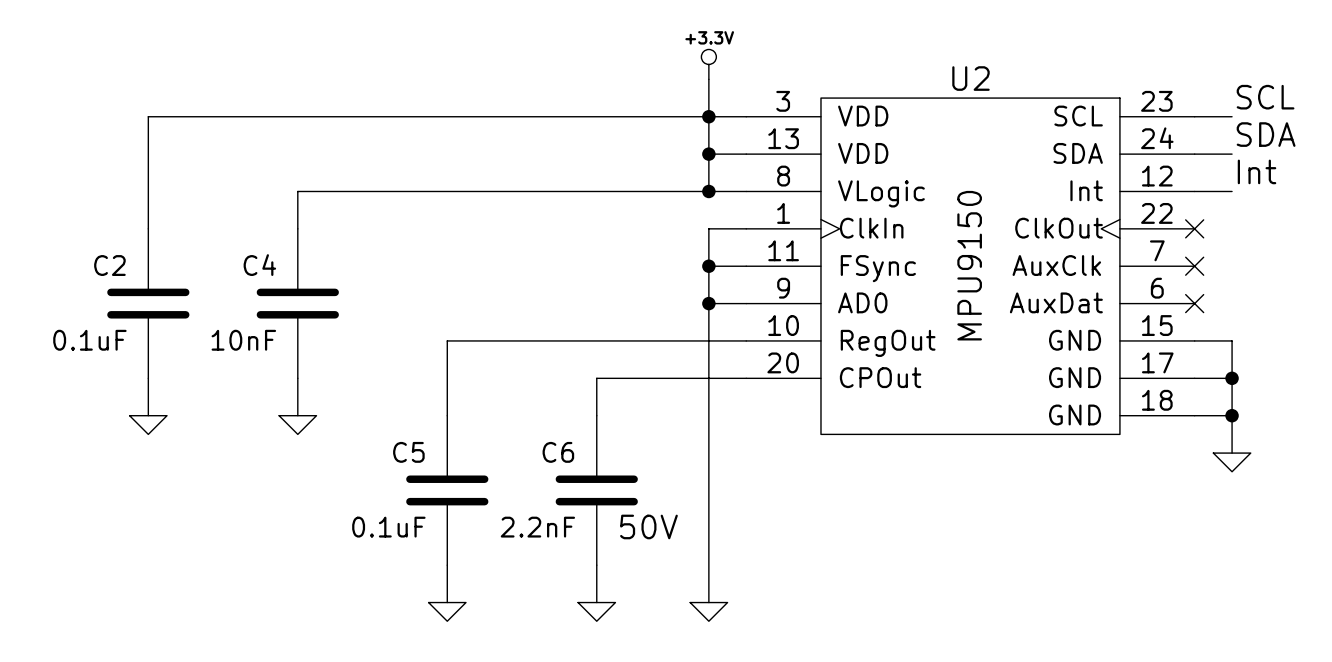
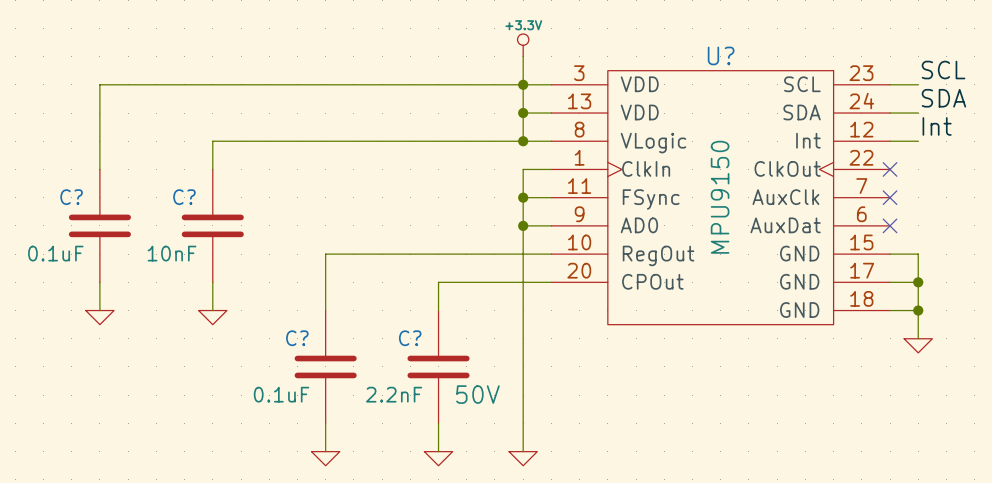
U2 name: U2 (971, 78) -> U? (721, 55)
C2 name: C2 (109, 265) -> C? (71, 197)
C4 name: C4 (259, 265) -> C? (184, 197)
C5 name: C5 (408, 452) -> C? (297, 338)
C6 name: C6 (558, 452) -> C? (410, 338)

